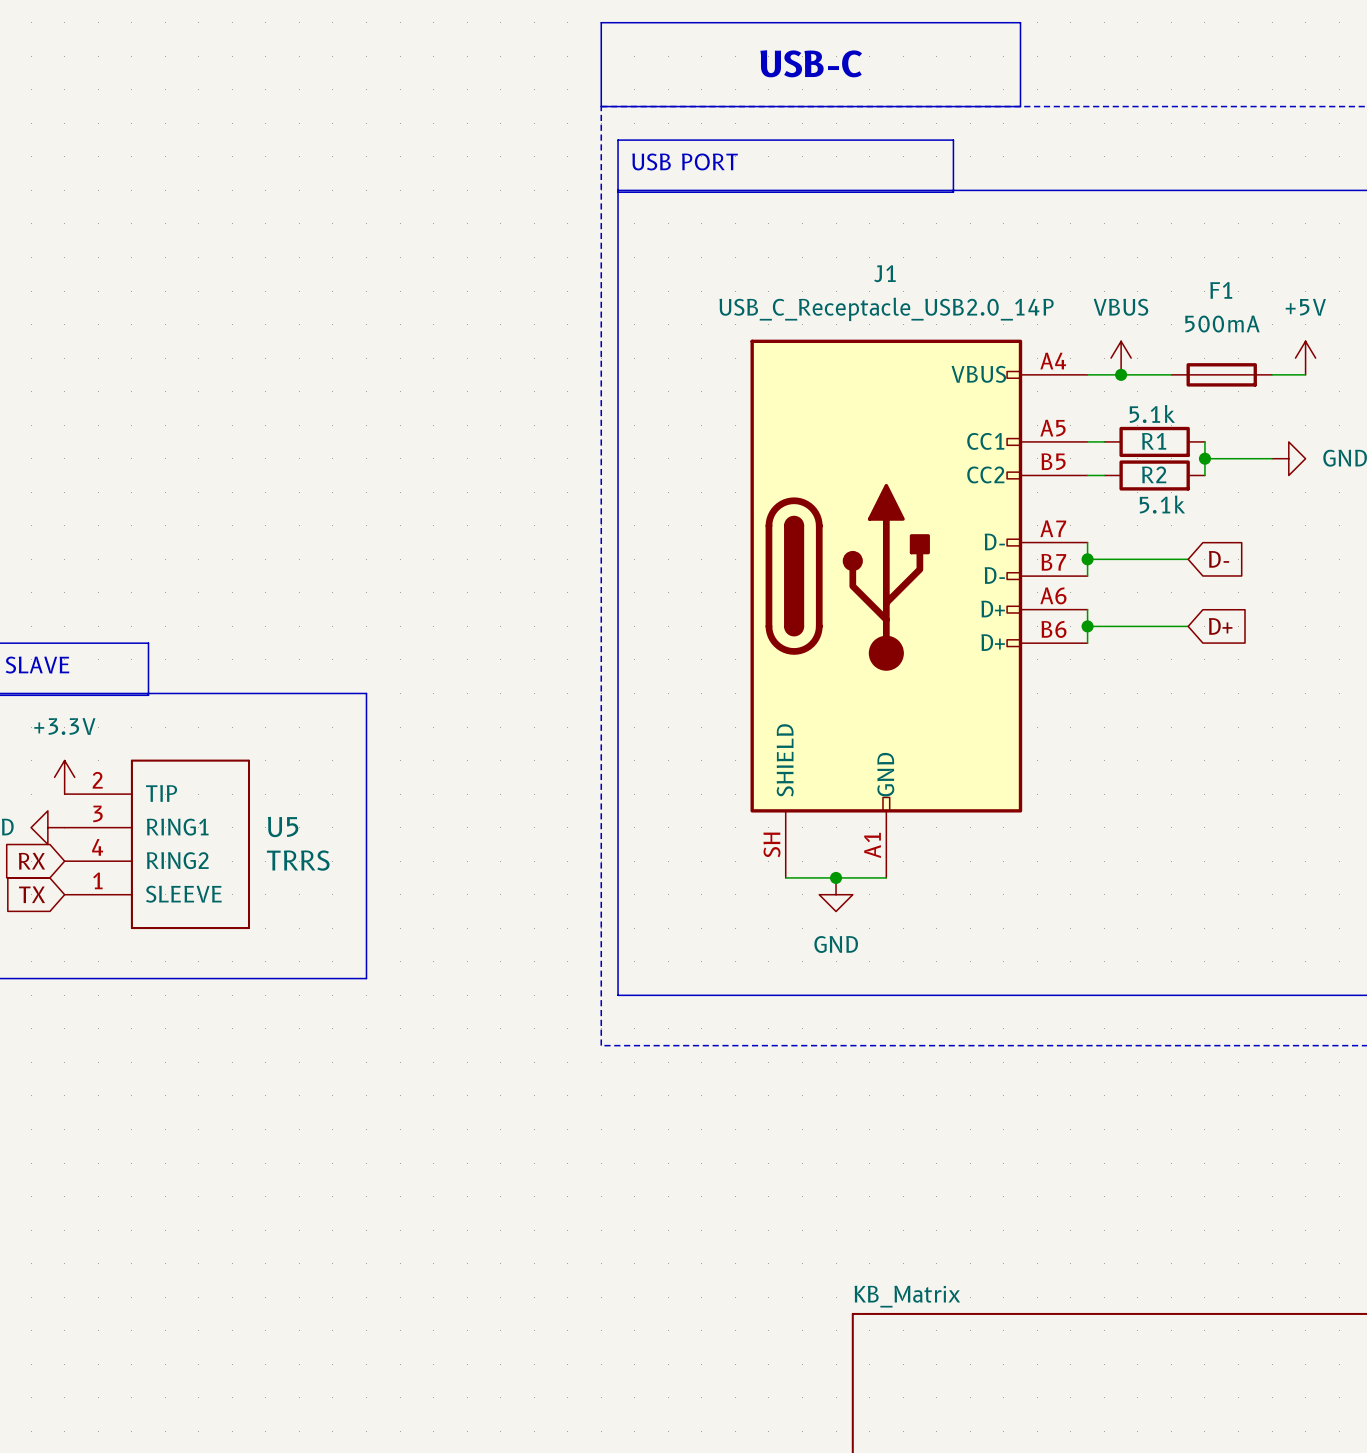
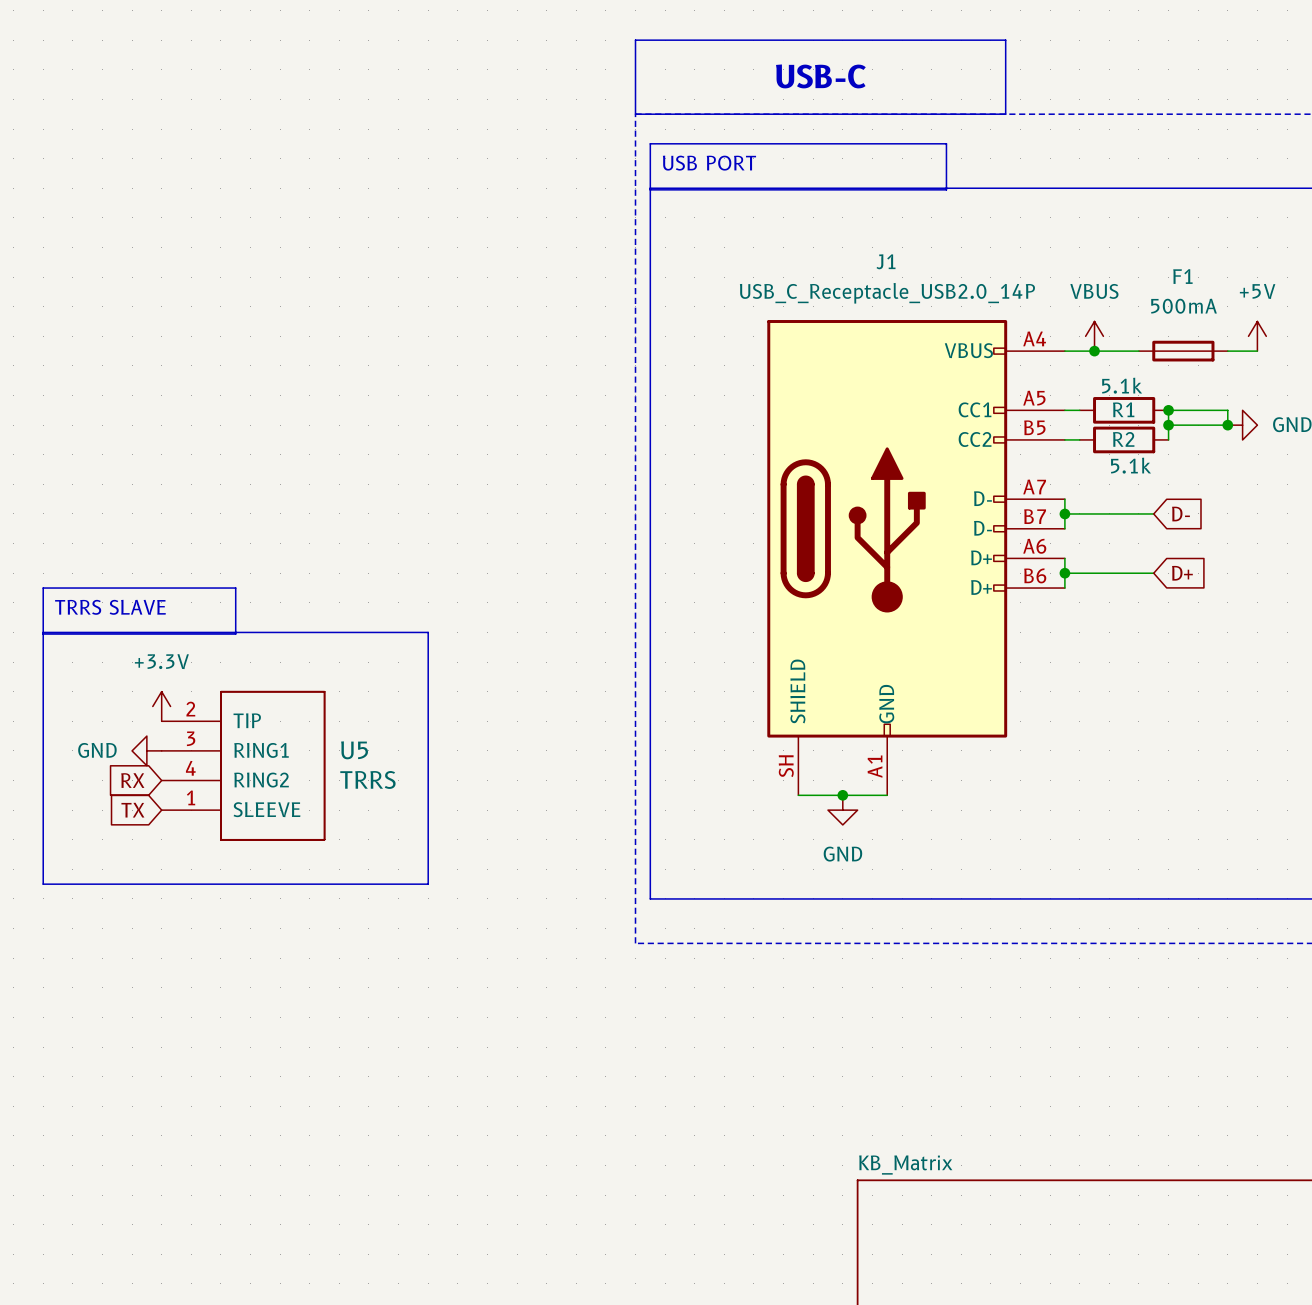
wire: none -> (1168, 410) (1227, 410) (1227, 425)
junction: none -> (1168, 410)
junction: none -> (1227, 425)

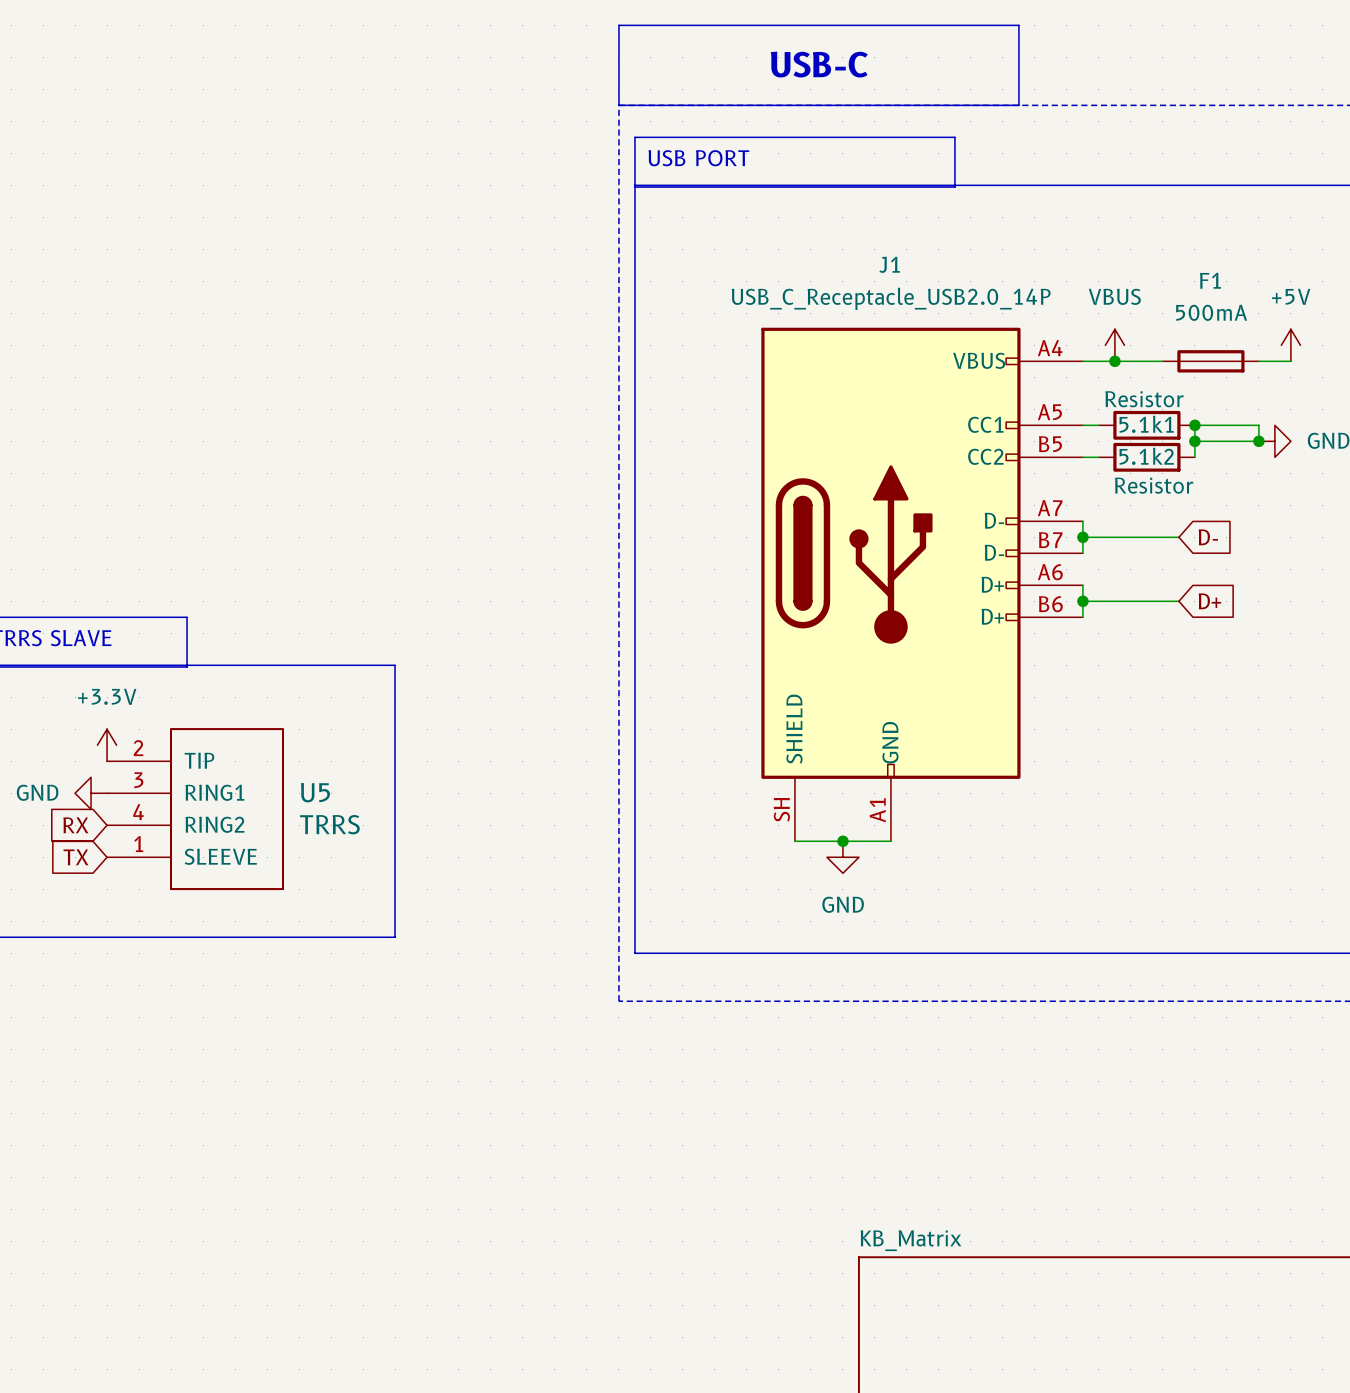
R1 value: 5.1k (1122, 385) -> Resistor (1144, 399)
R1 name: R1 (1123, 409) -> 5.1k1 (1146, 424)
R2 name: R2 (1123, 439) -> 5.1k2 (1146, 456)
R2 value: 5.1k (1131, 465) -> Resistor (1154, 485)

